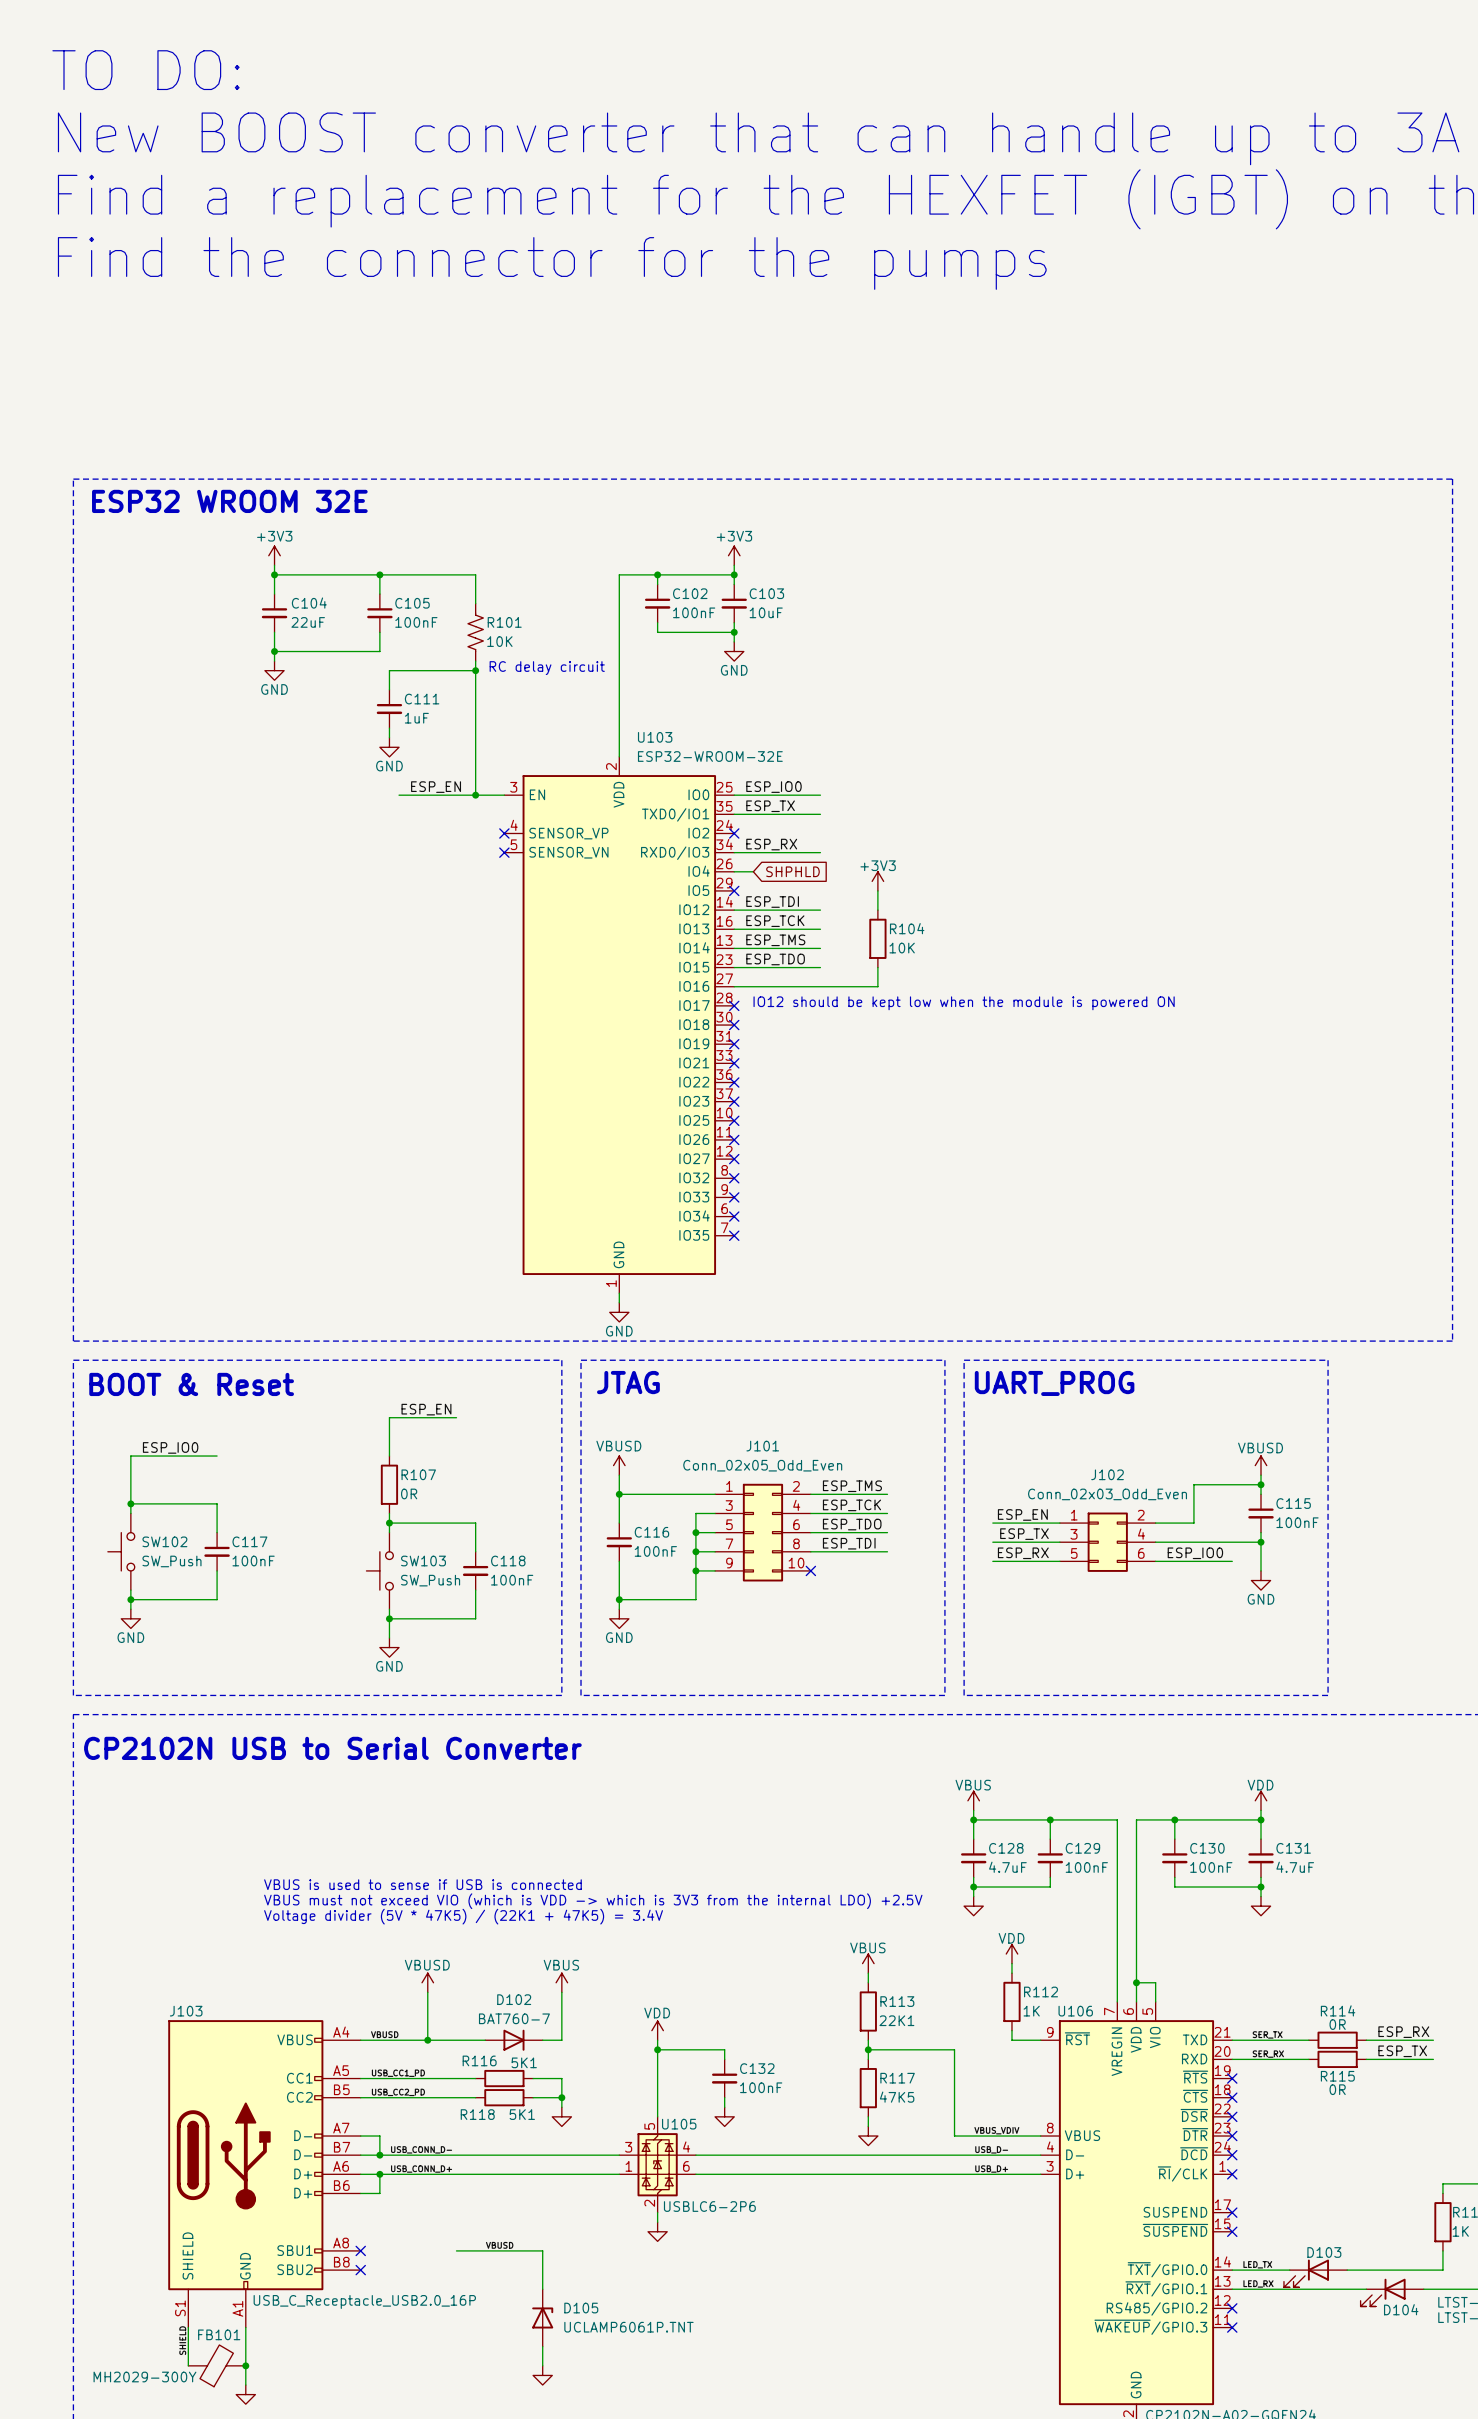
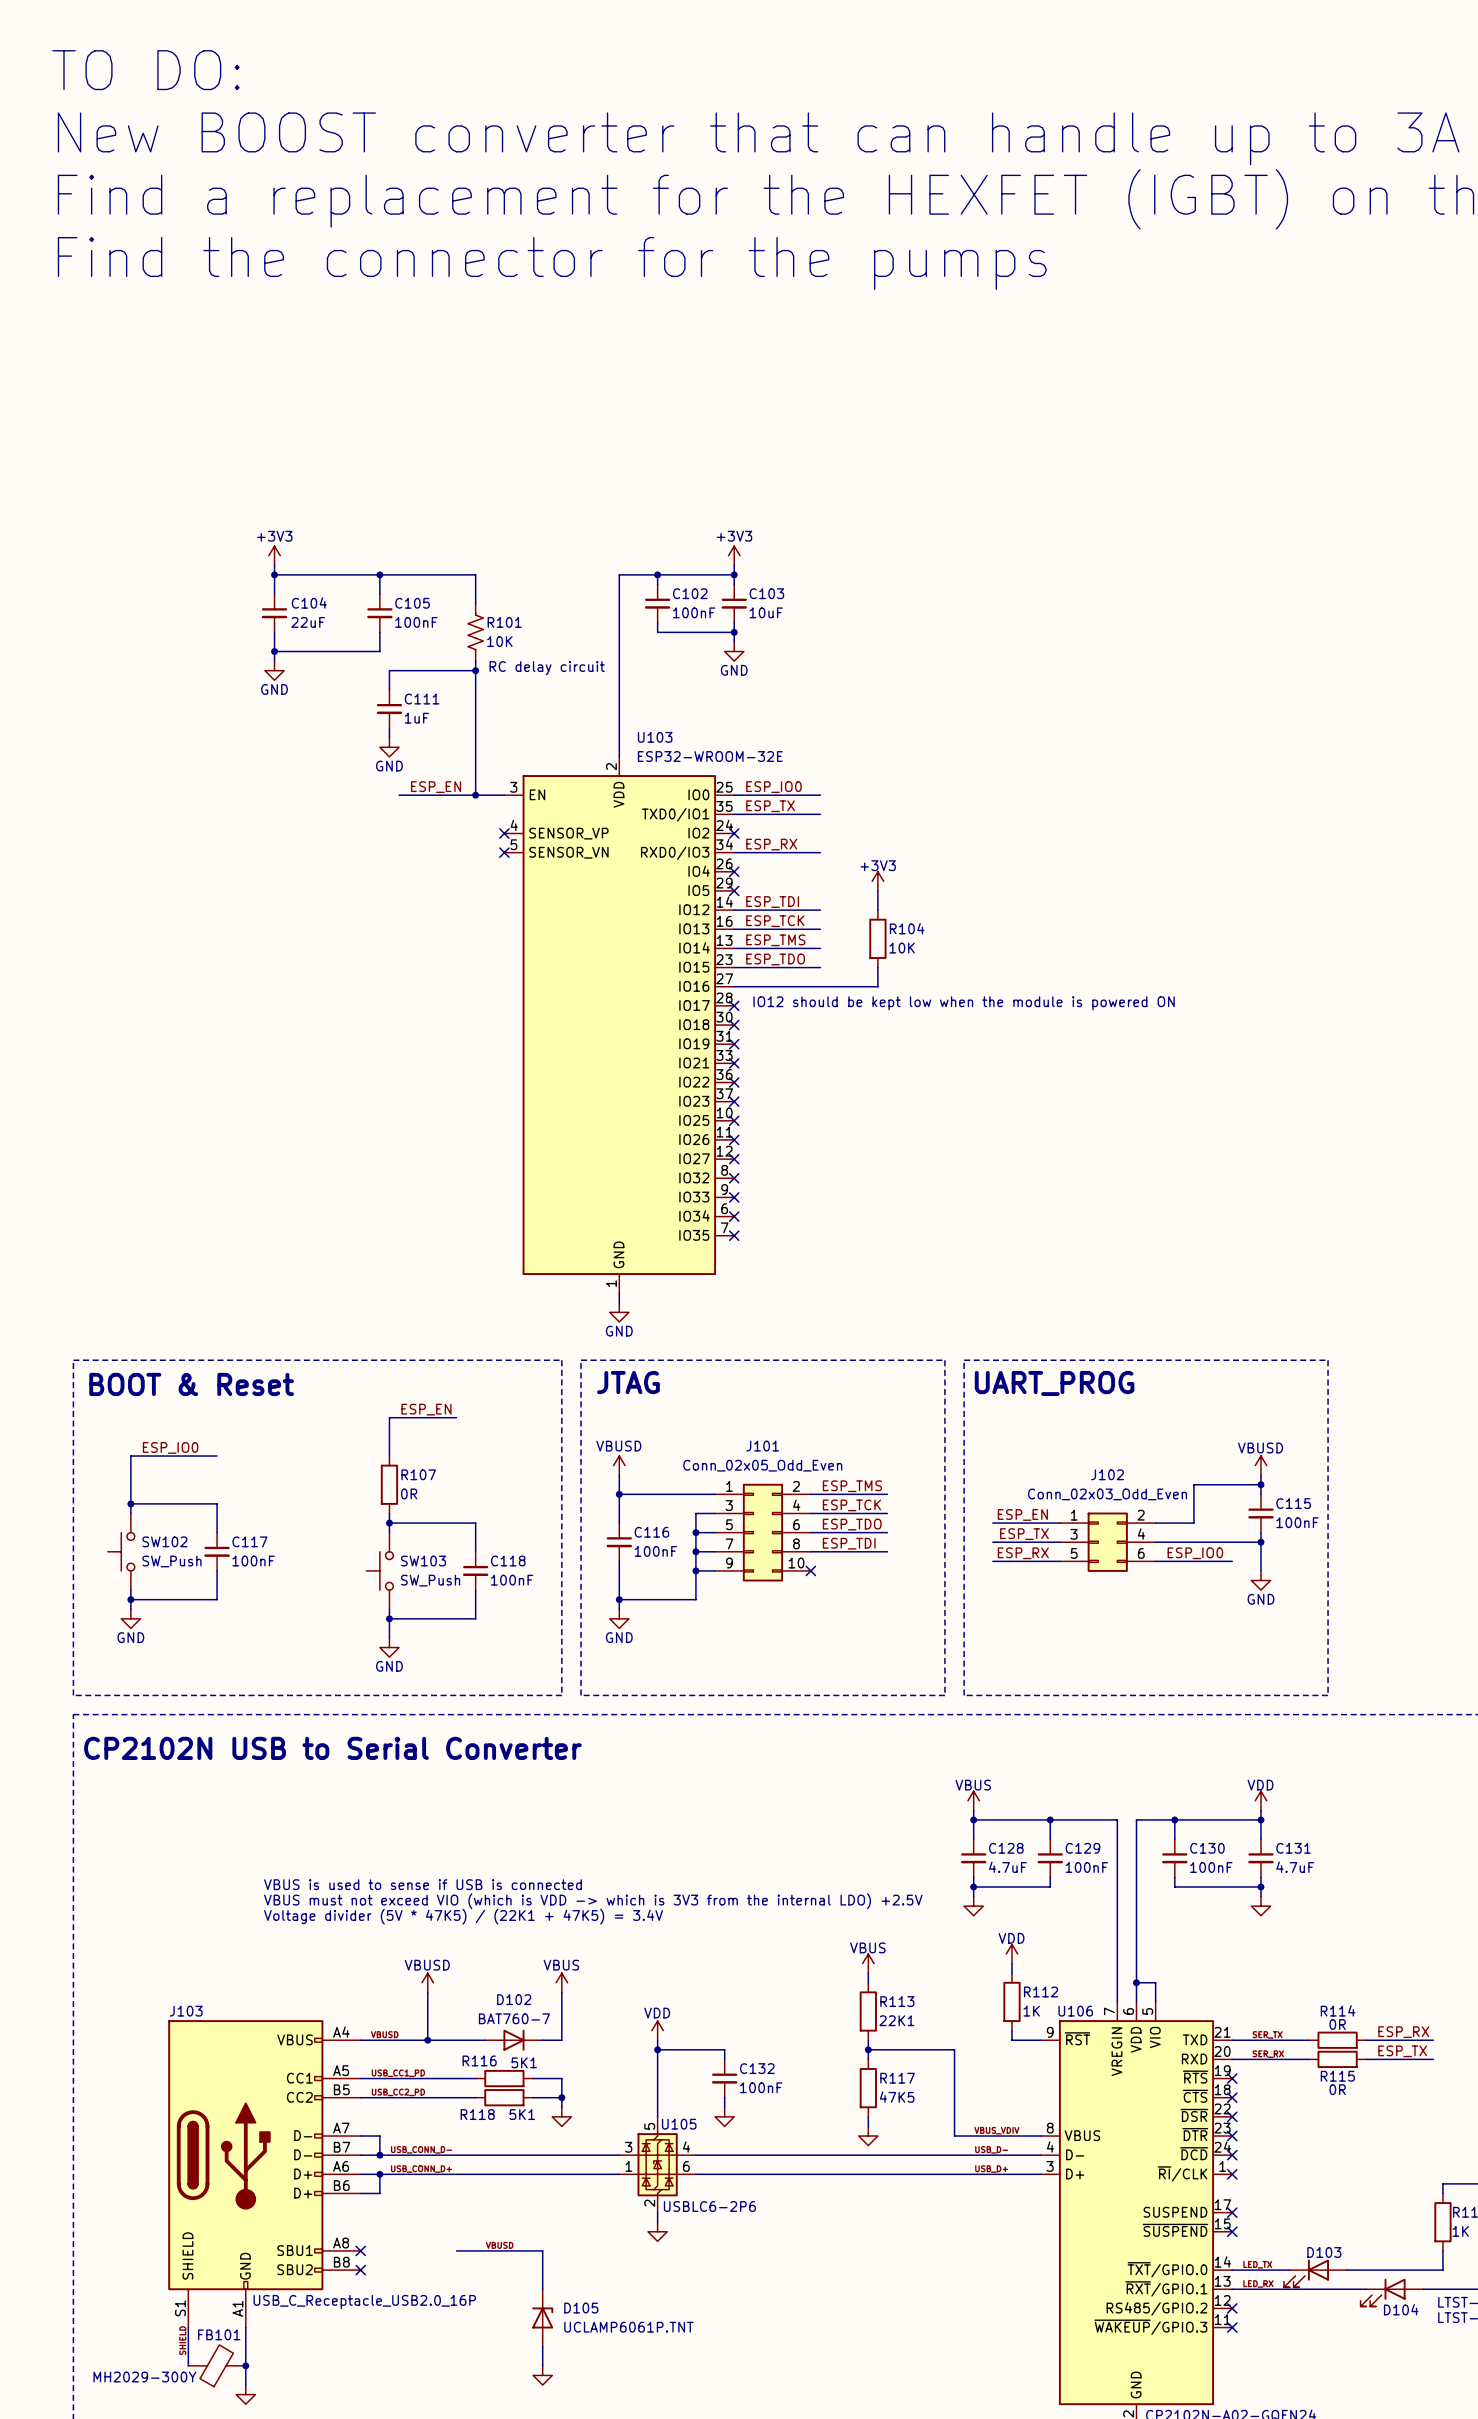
line: (73, 479) (1452, 479) (1452, 1341) (73, 1341) (73, 479) -> none
text: ESP32 WROOM 32E (229, 501) -> none
wire: (734, 871) (753, 871) -> none
no-connect mark: none -> (734, 871)
global label: SHPHLD (792, 871) -> none

